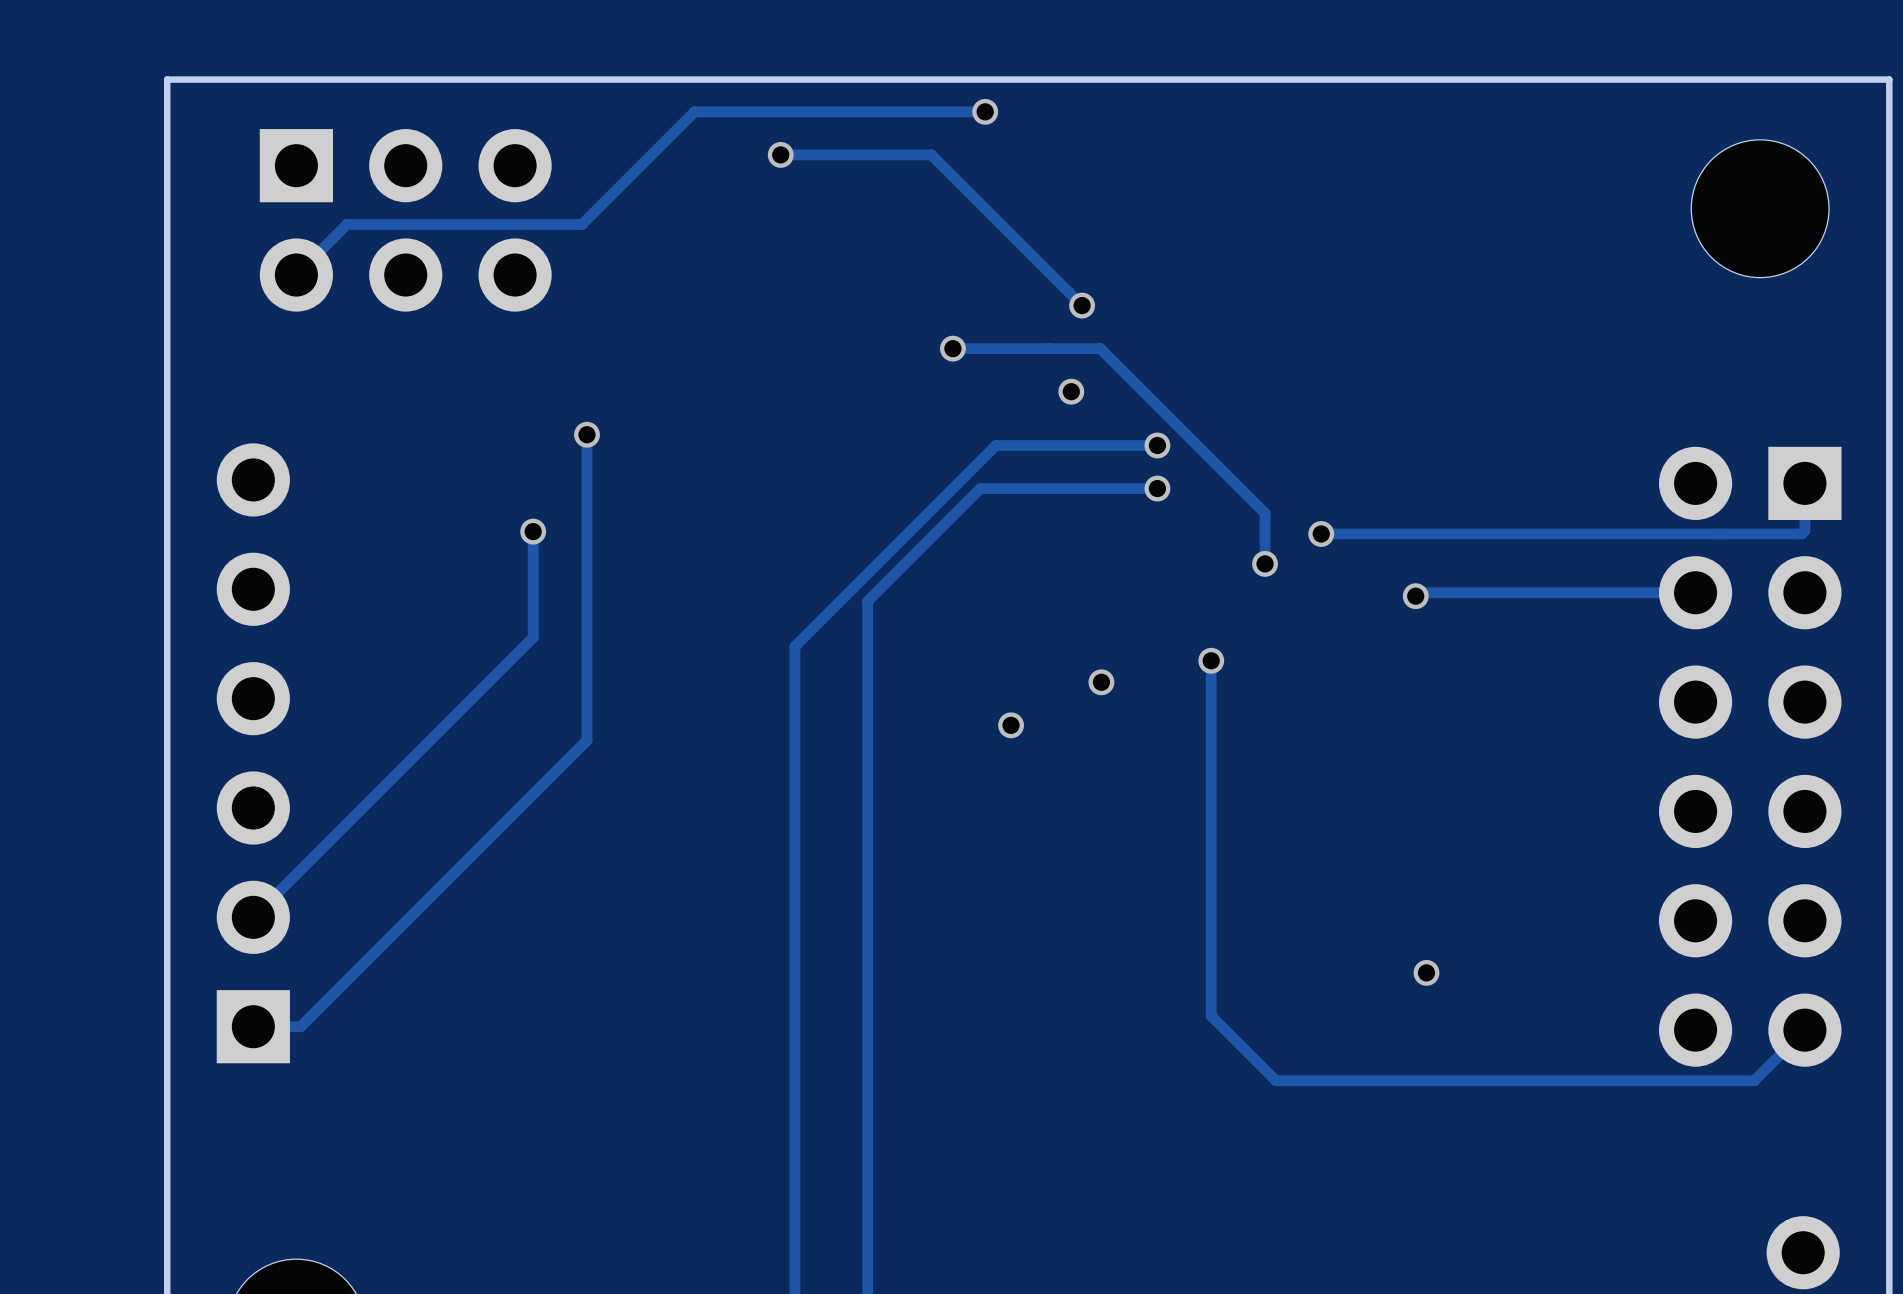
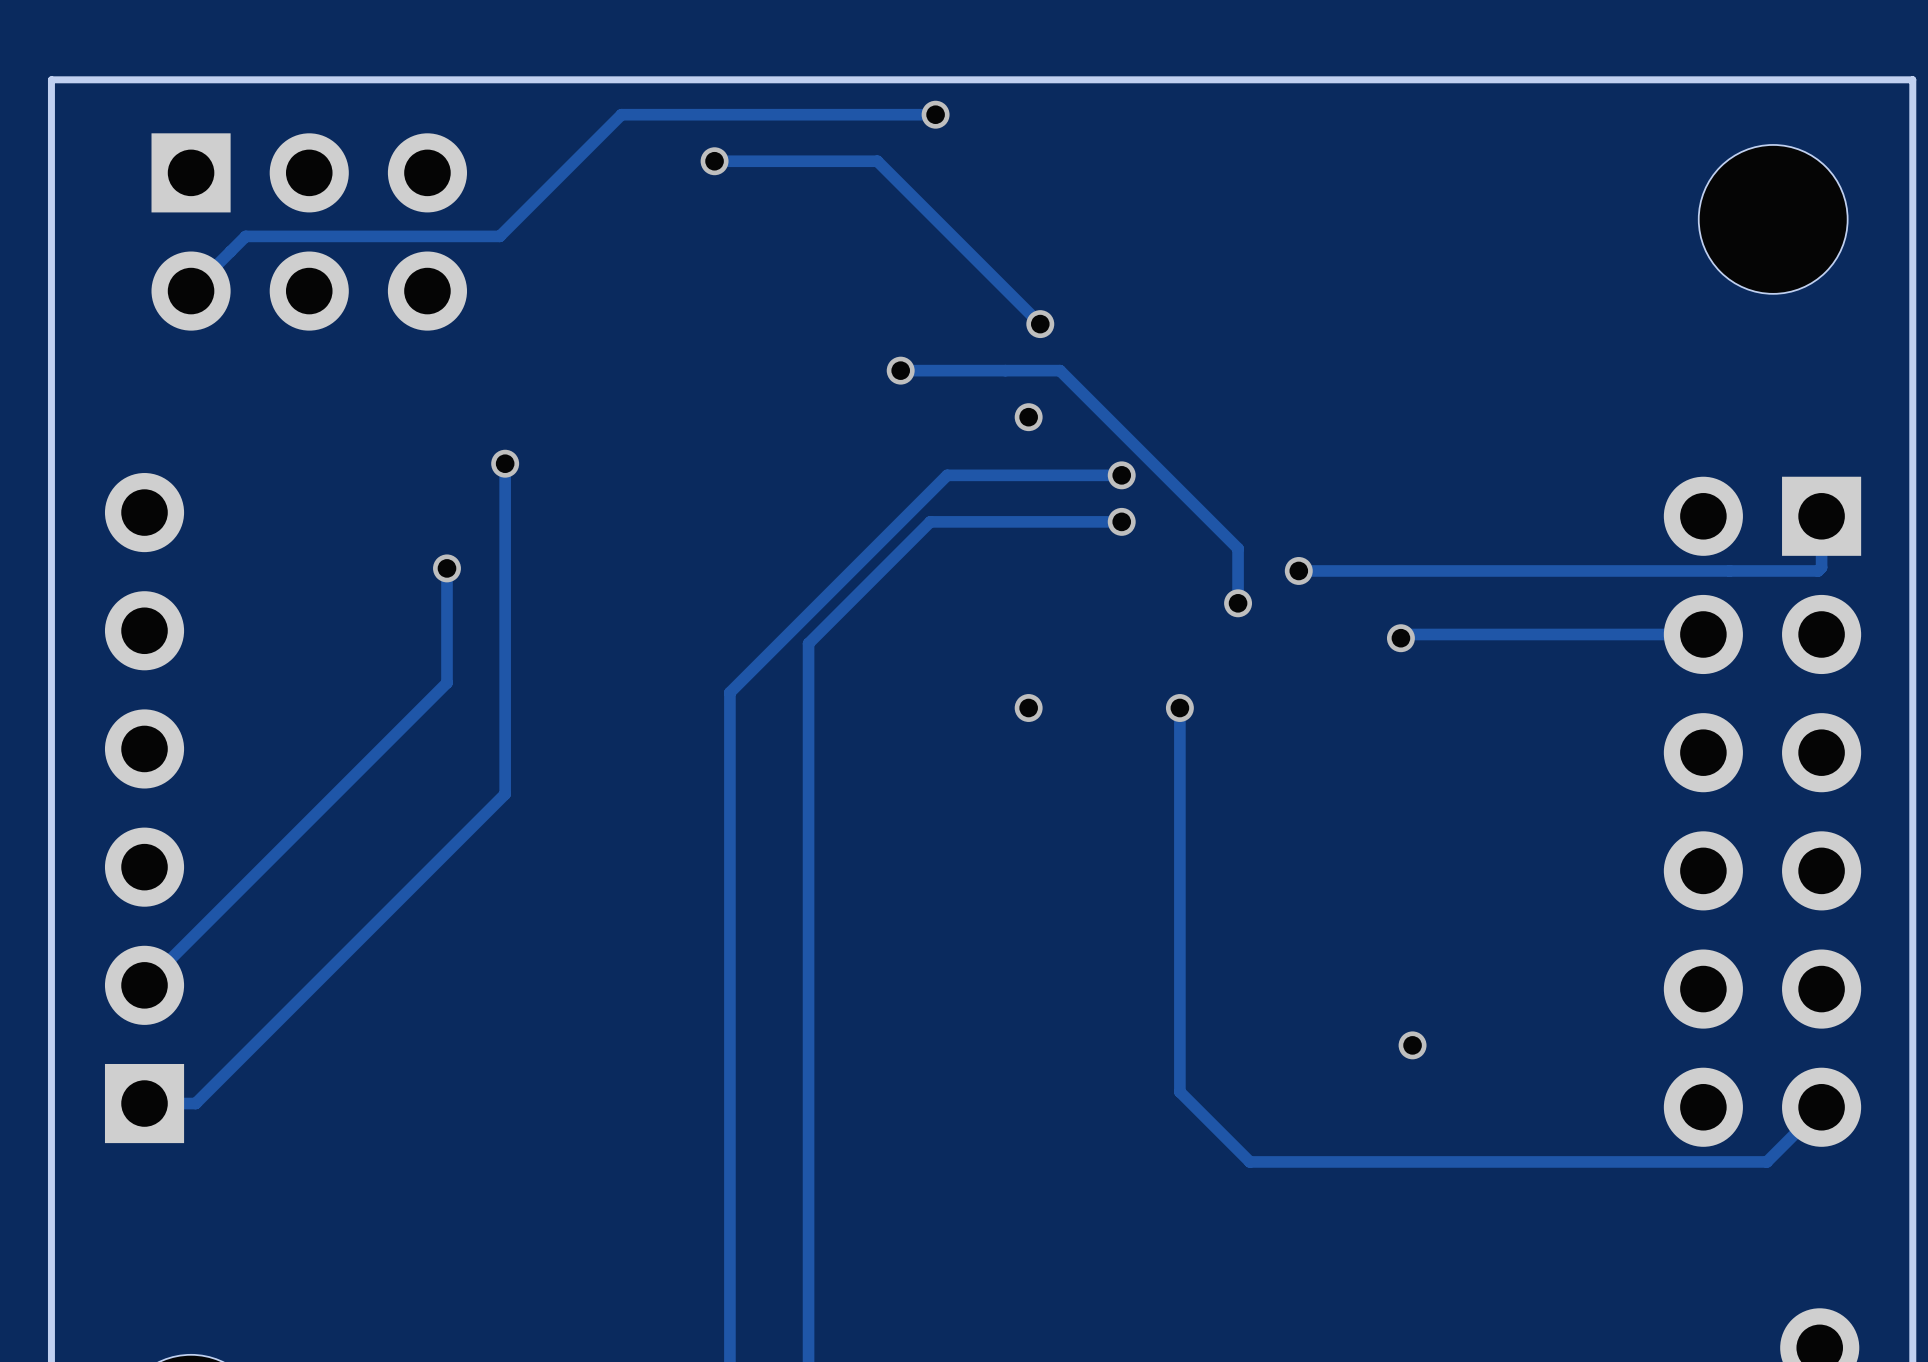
via position: (1101, 682) -> (1028, 708)
via: (1011, 725) -> none

